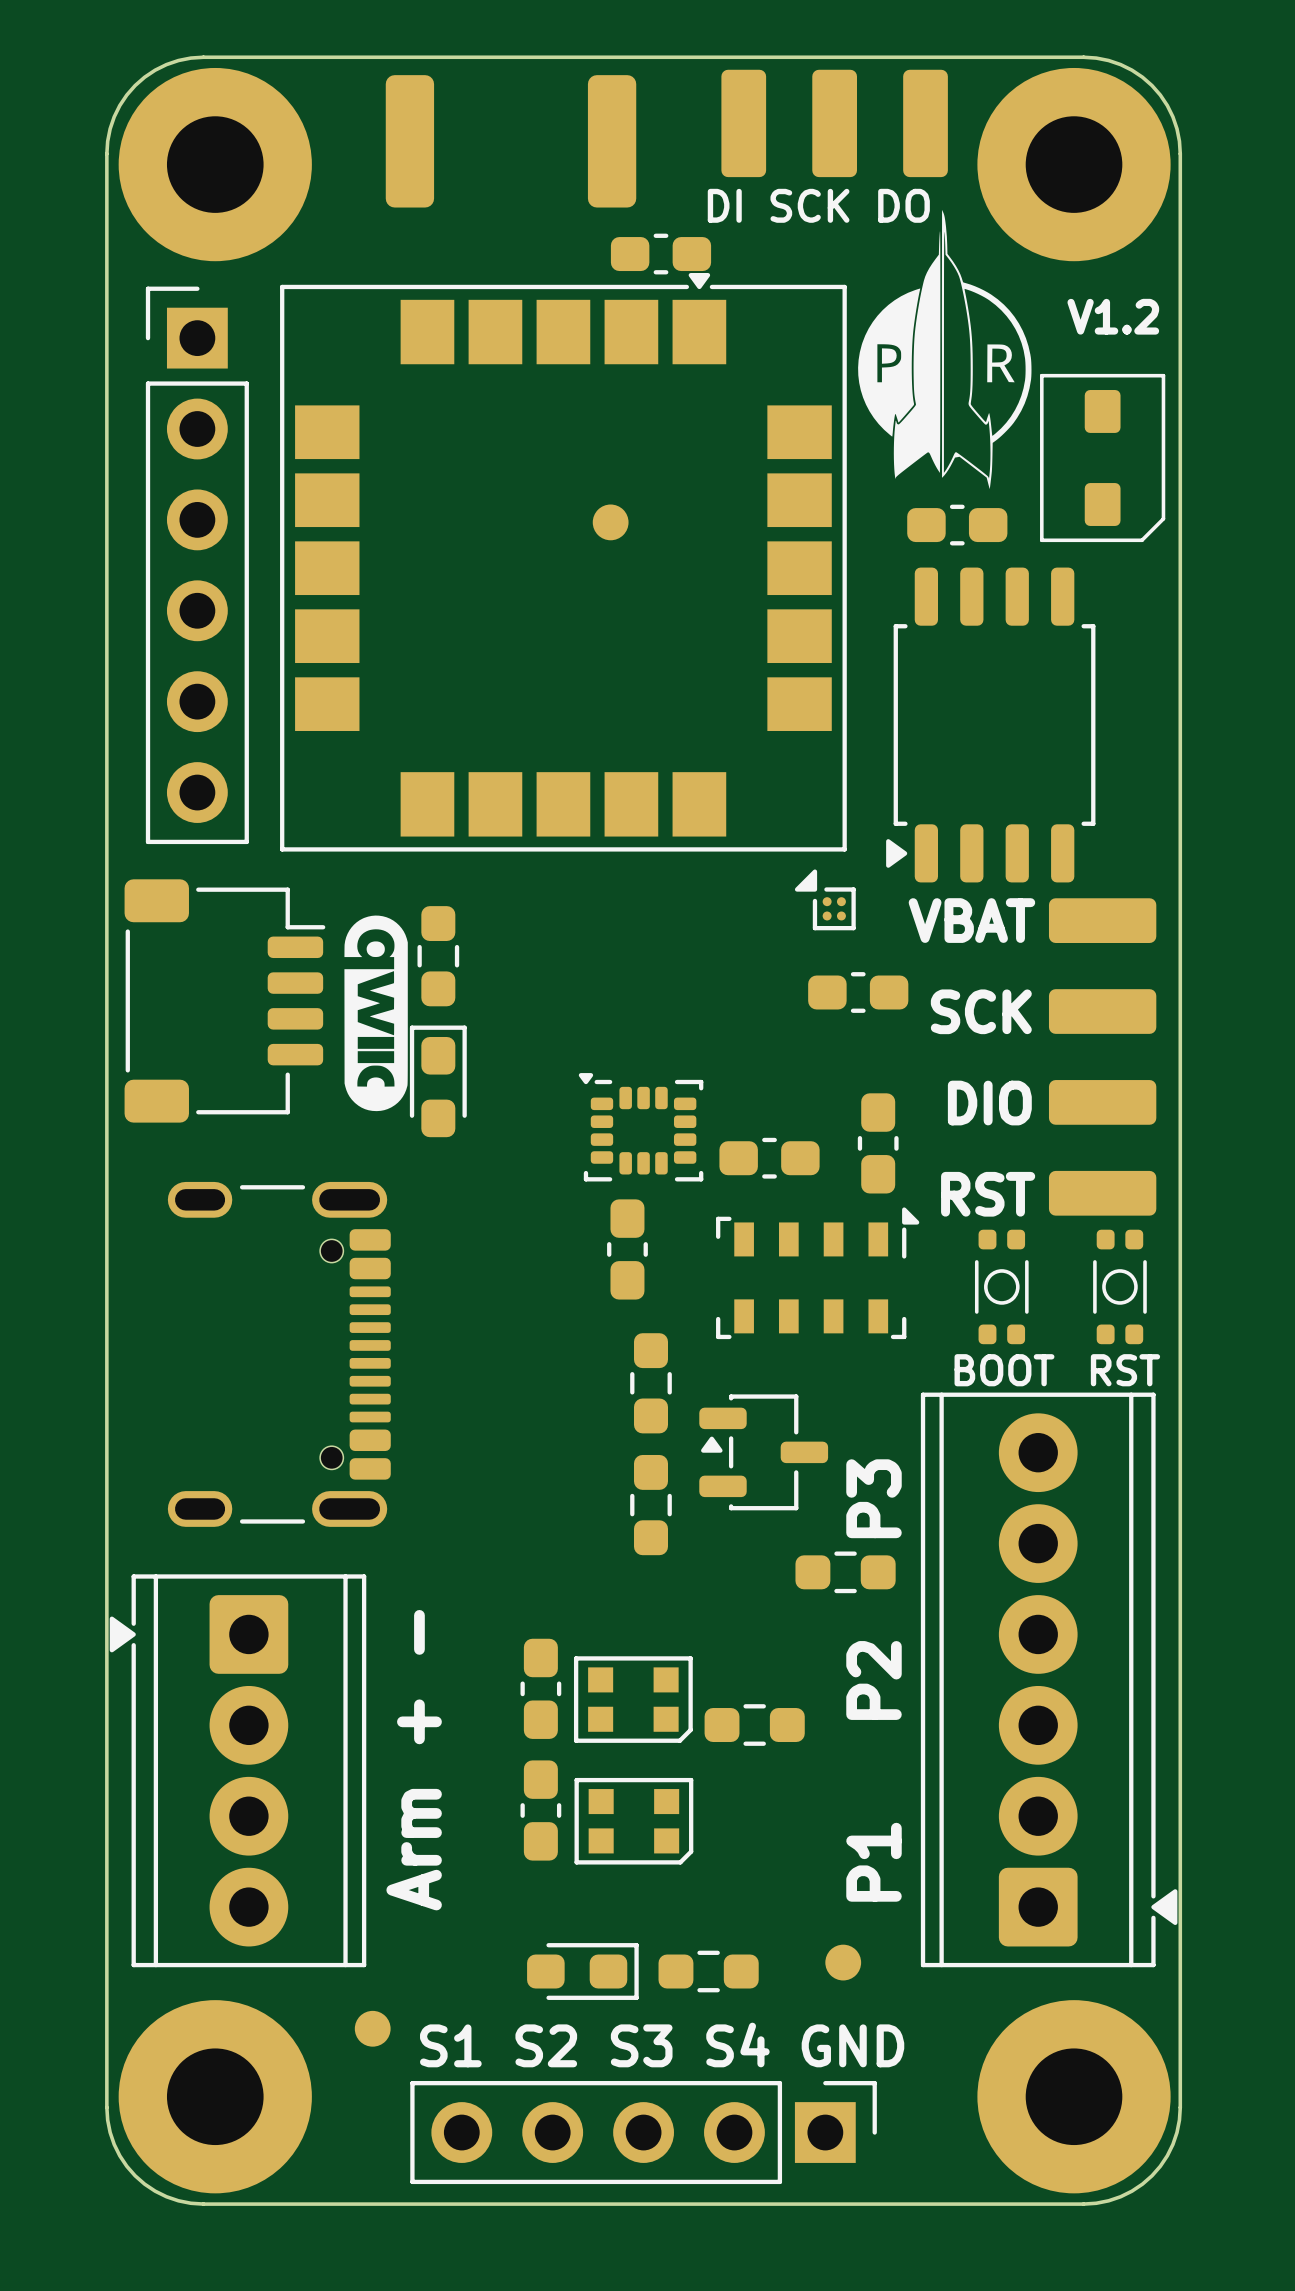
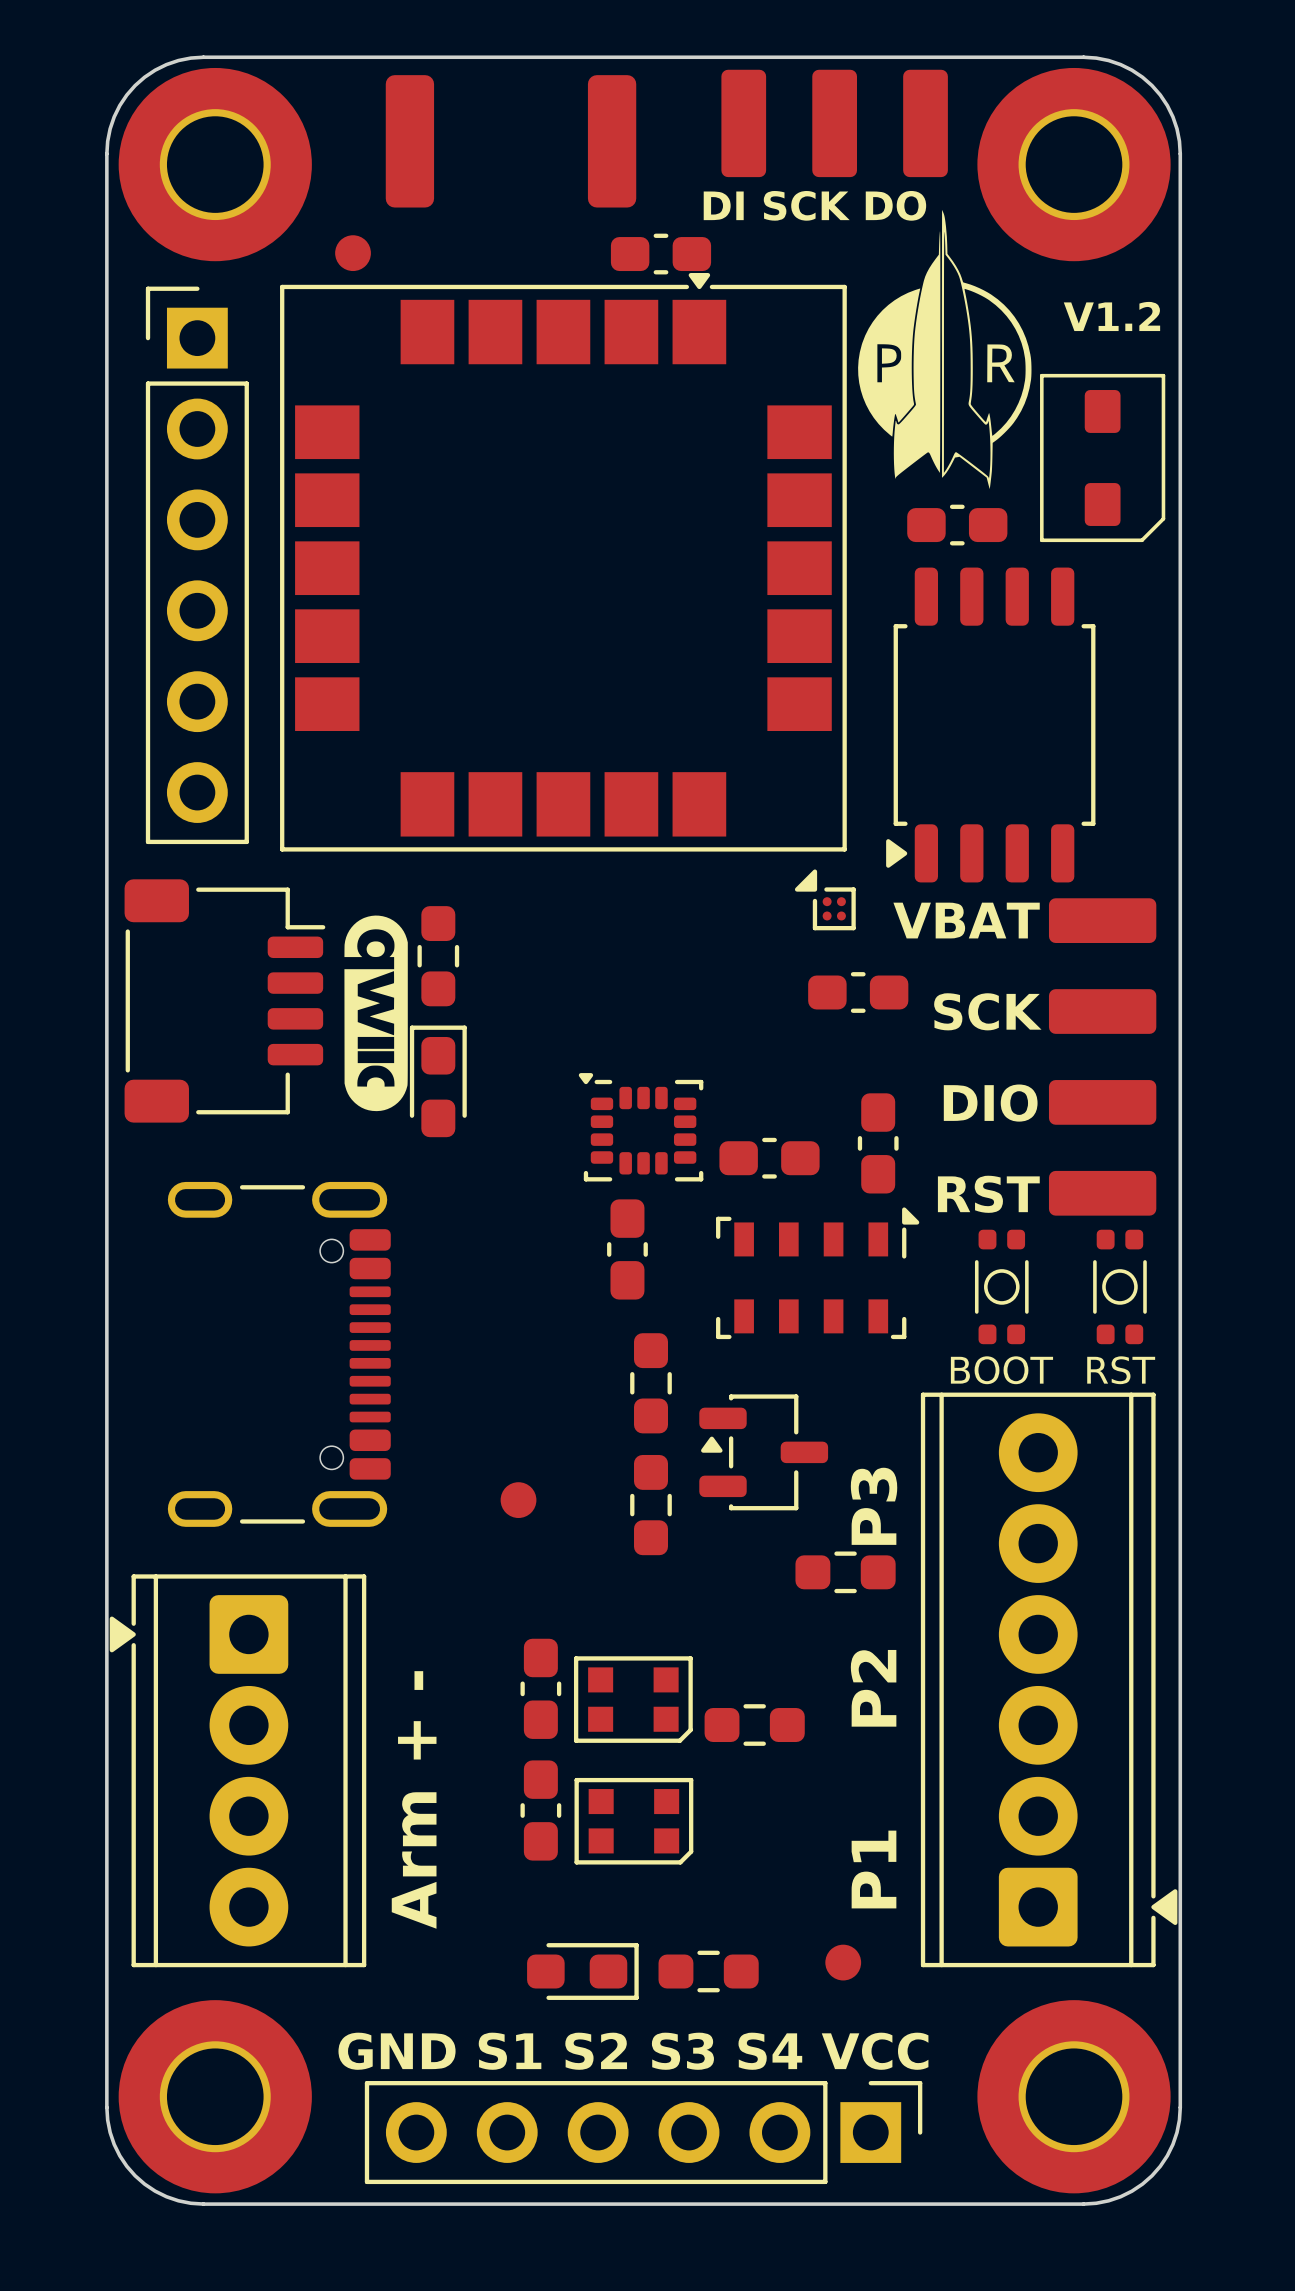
part position: (610, 522) -> (353, 253)
part: none -> (518, 1500)
part: (372, 2028) -> none
text: S1 S2 S3 S4 GND (662, 2045) -> GND S1 S2 S3 S4 VCC (633, 2051)
part footprint: [410, 2081, 877, 2185] -> [364, 2081, 923, 2185]

